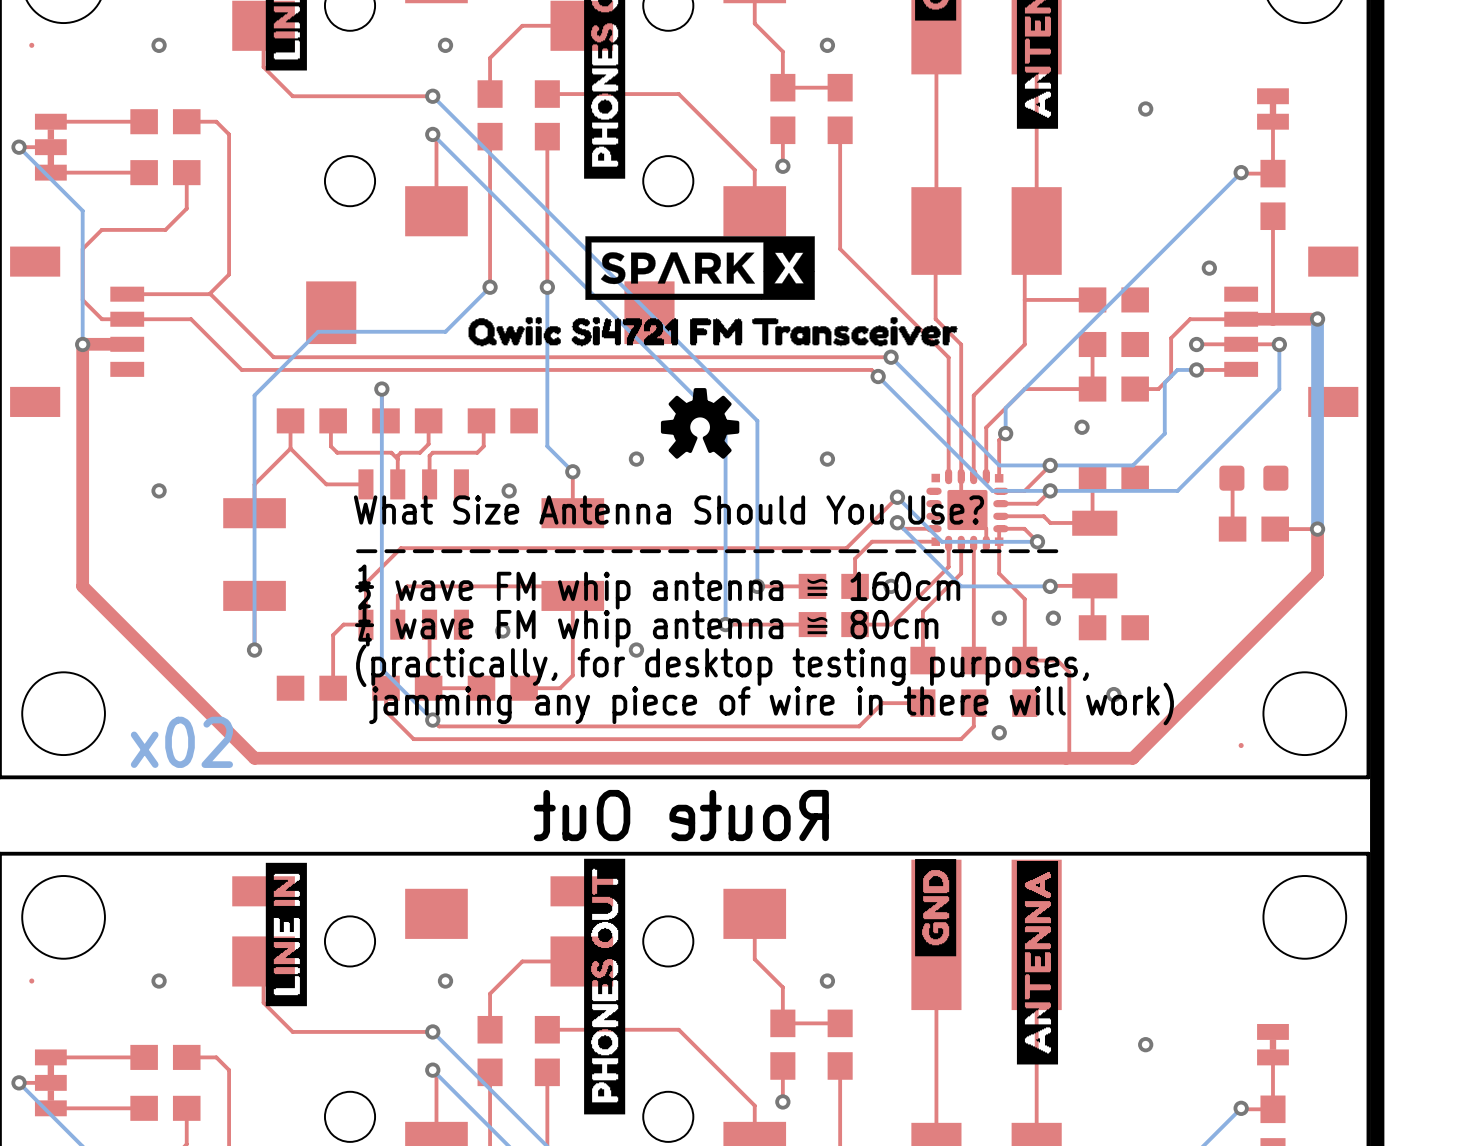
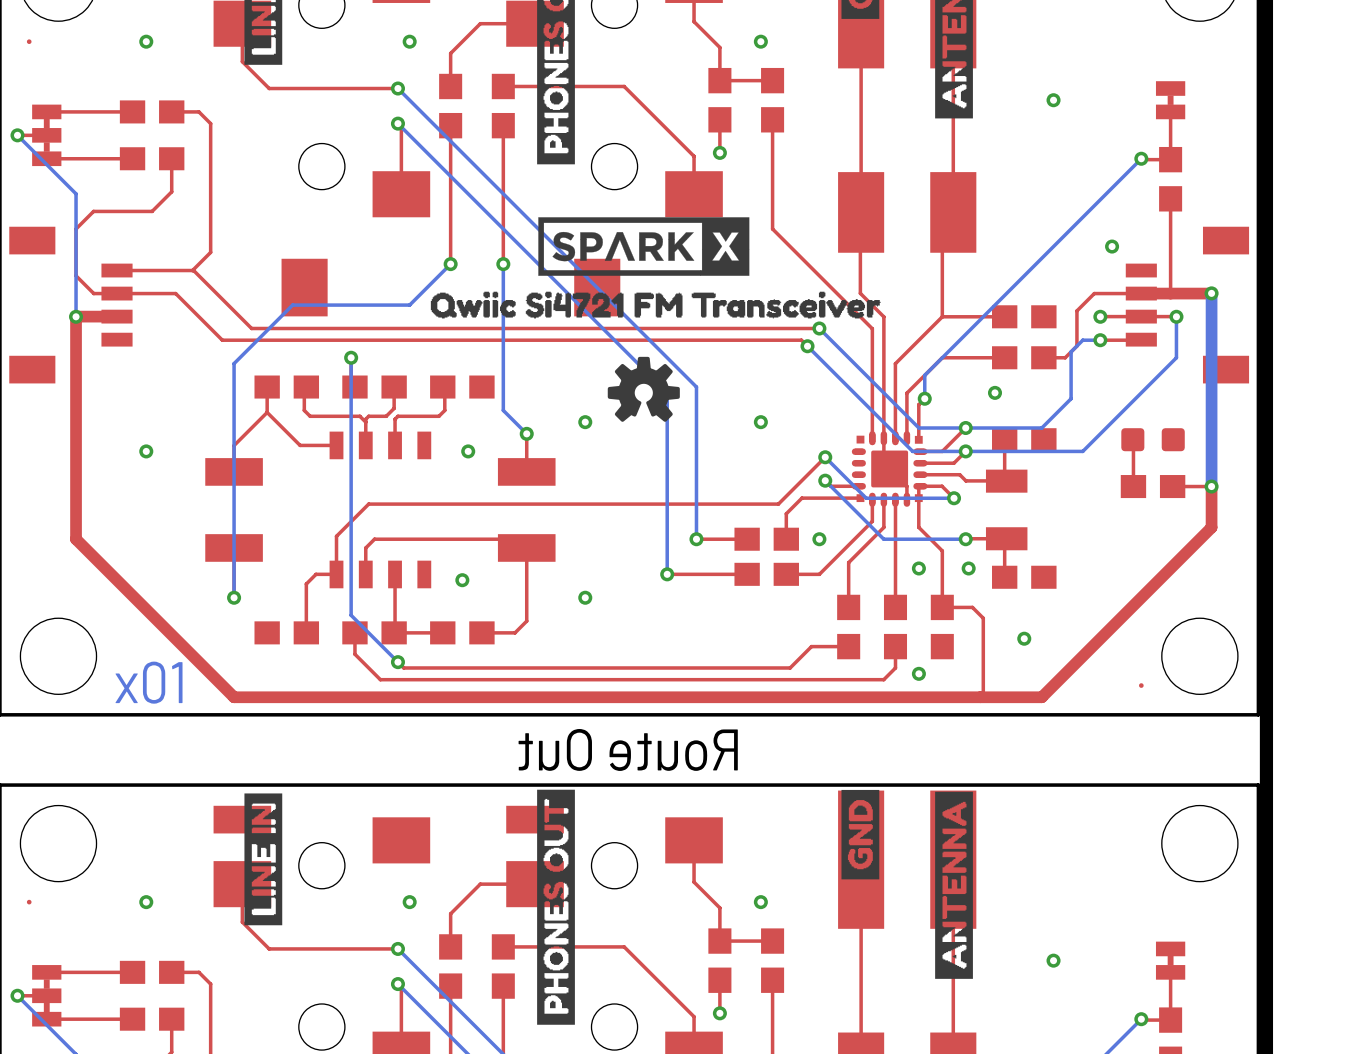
top track: (1092, 299) (1024, 299) -> none
part: (1113, 299) -> none
top track: (1092, 344) (1092, 389) -> (1004, 316) (942, 316)
text: What Size Antenna Should You Use? (668, 509) -> none
text: ------------------------- (707, 551) -> none
text: ½ wave FM whip antenna ≌ 160cm (657, 586) -> none
text: ¼ wave FM whip antenna ≌ 80cm (646, 625) -> none
text: (practically, for desktop testing purposes, (722, 665) -> none
text: jamming any piece of wire in there will work) (771, 703) -> none
text: x02 (181, 742) -> x01 (148, 682)

